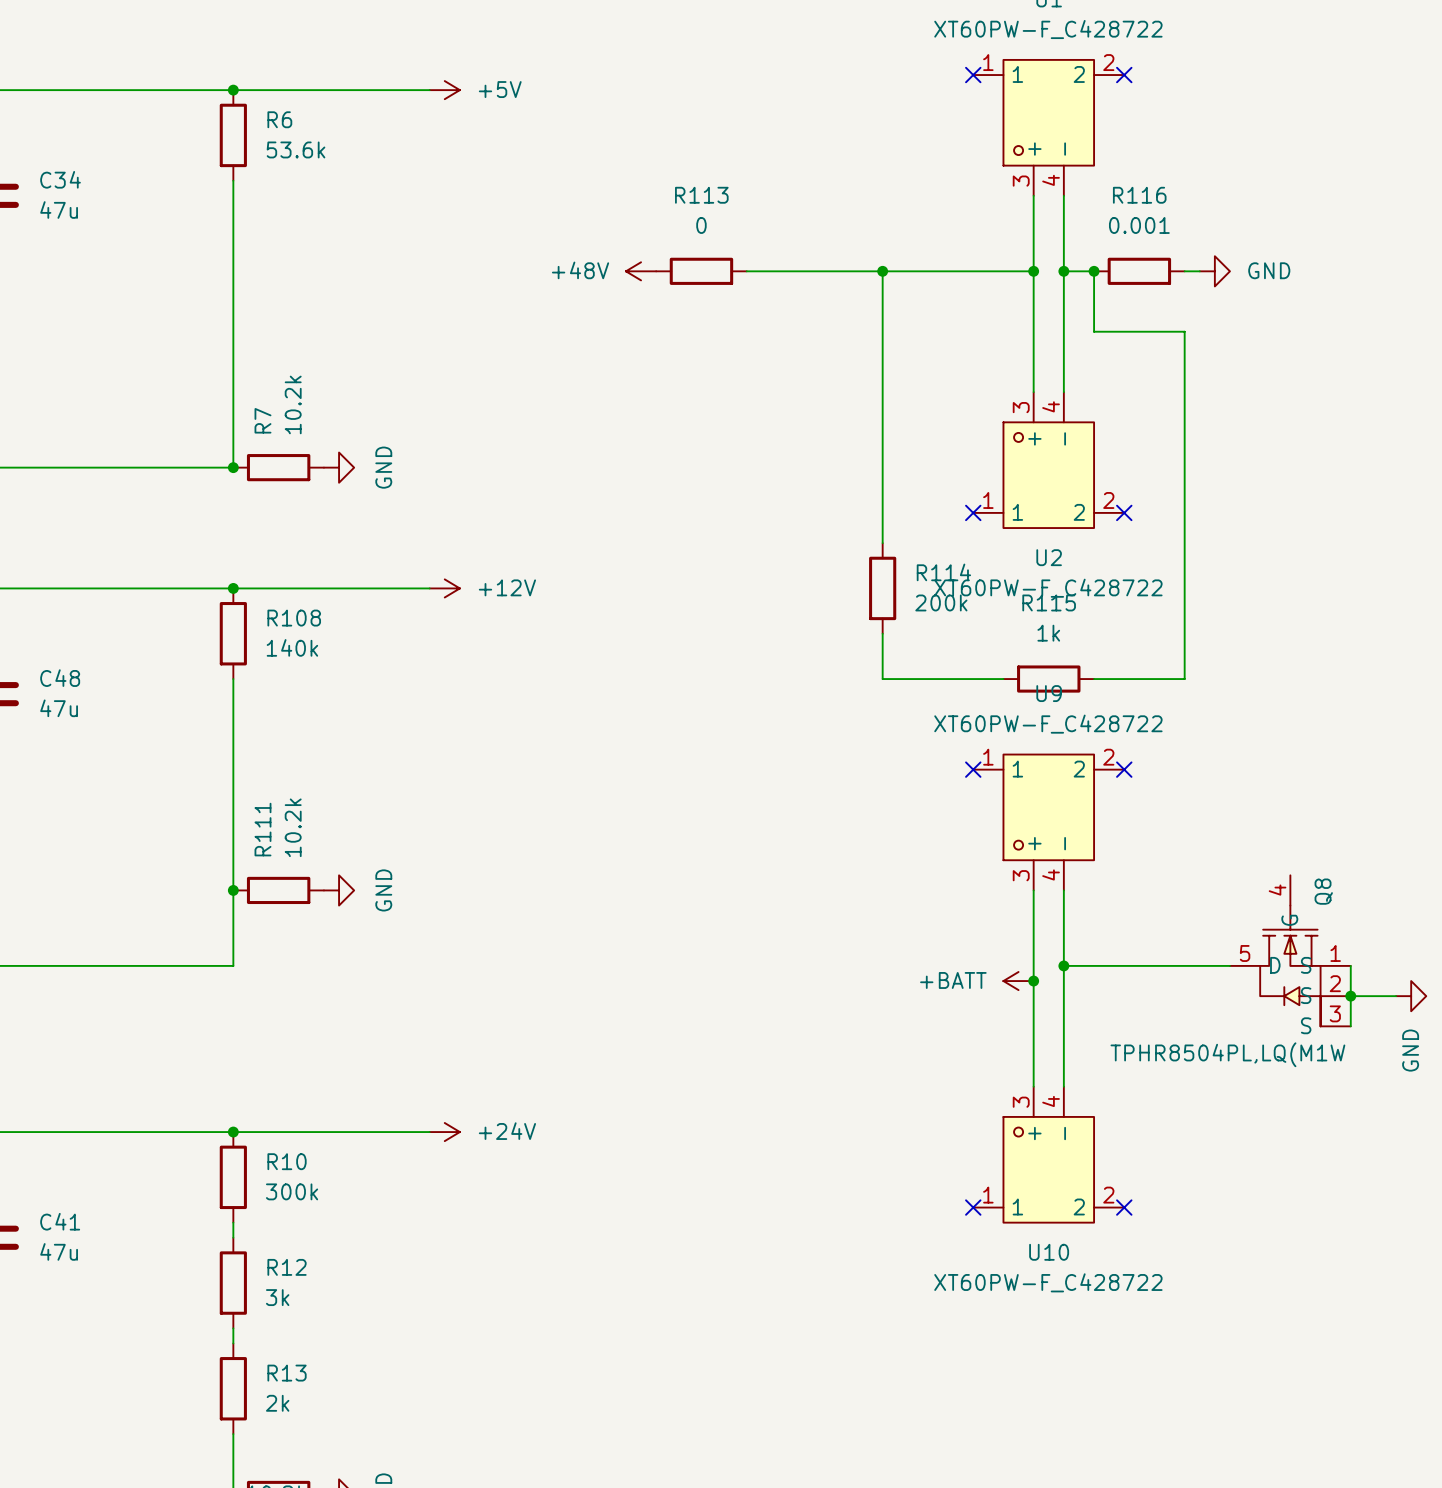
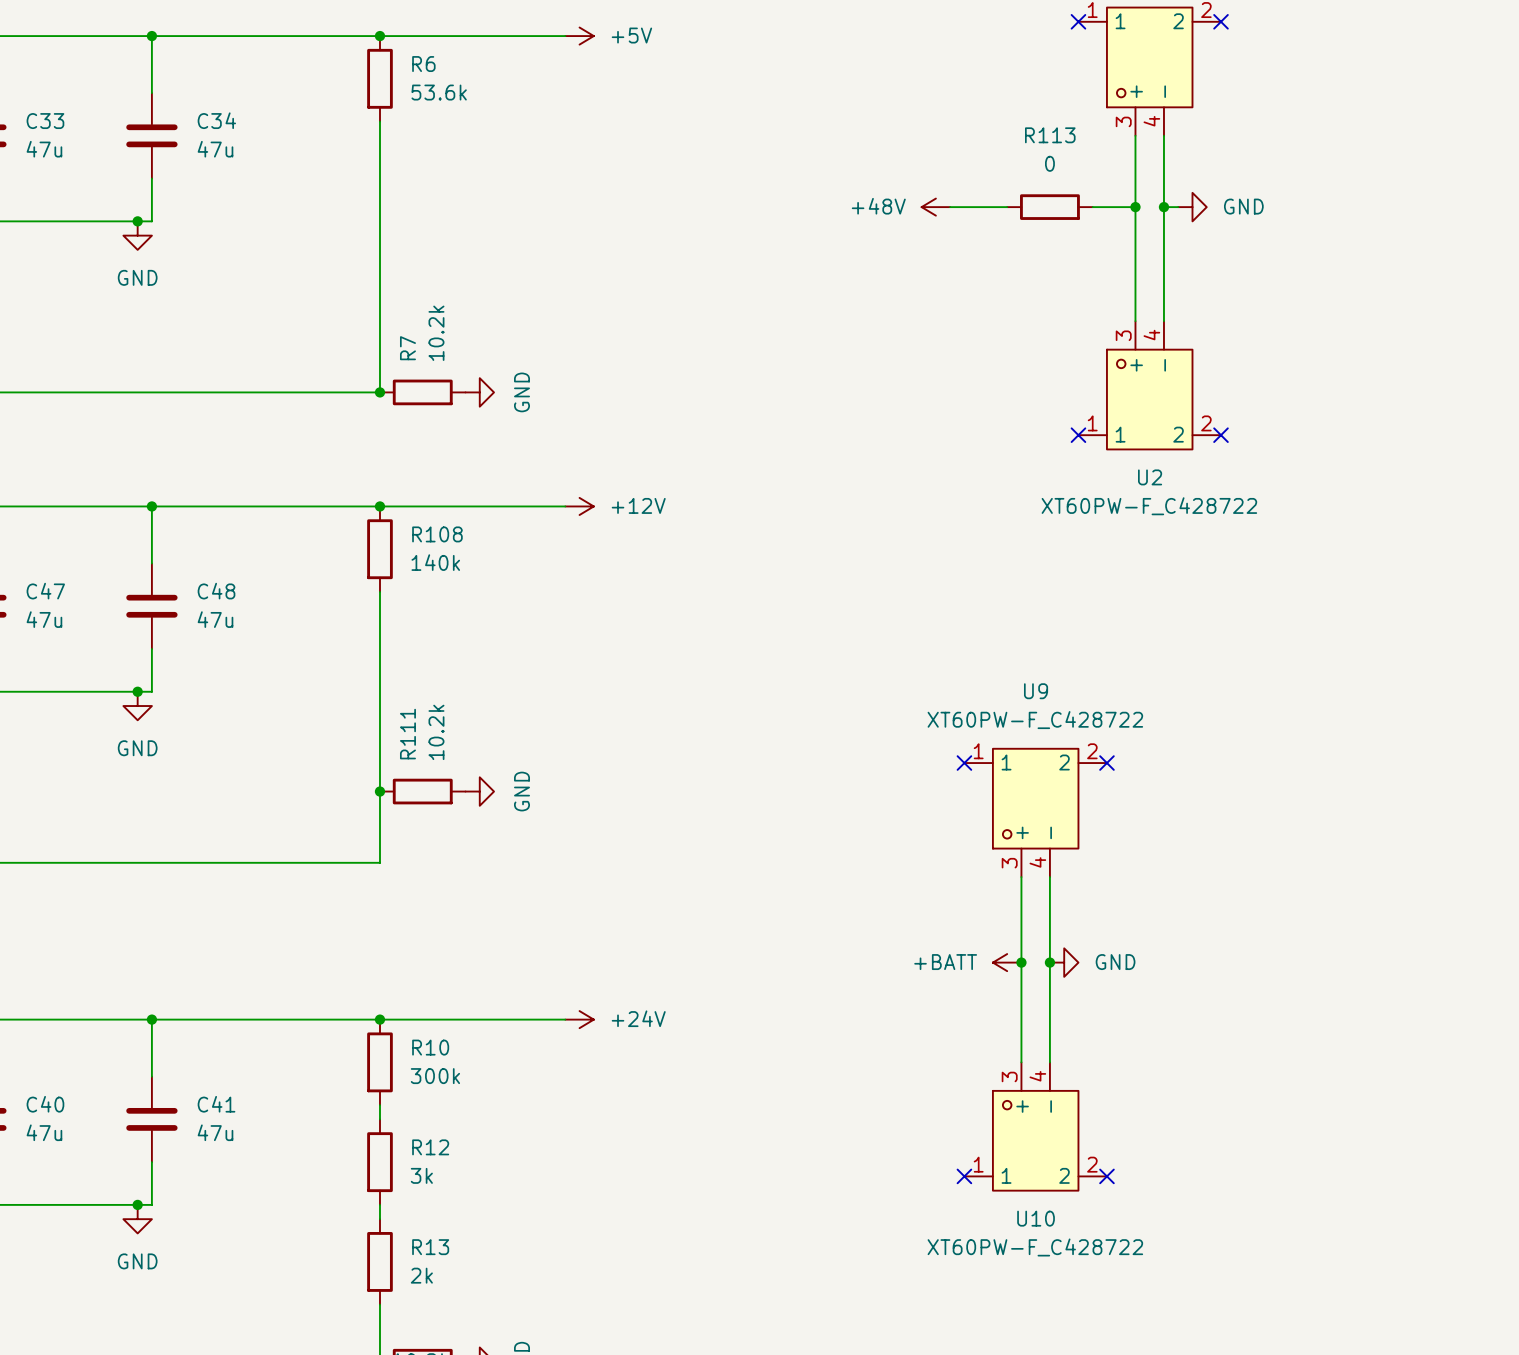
power symbol position: +48V (641, 271) -> +48V (935, 207)
R113 position: (701, 271) -> (1049, 207)
wire: (746, 271) (837, 271) -> none
wire: (882, 271) (882, 543) -> none
junction: (882, 271) -> none
wire: (897, 271) (988, 271) -> none
wire: (1078, 271) (1094, 271) (1094, 331) (1184, 331) (1184, 679) (1094, 679) -> none
junction: (1094, 271) -> none
R116: 0.001 (1139, 271) -> none
wire: (1184, 271) (1199, 271) -> none
power symbol position: GND (1214, 271) -> GND (1192, 207)
R114: 200k (882, 588) -> none
wire: (882, 633) (882, 679) (1003, 679) -> none
R115: 1k (1048, 679) -> none
no-connect mark: (973, 769) -> none
no-connect mark: (1124, 769) -> none
U9 position: (1048, 822) -> (1035, 812)
no-connect mark: none -> (964, 763)
no-connect mark: none -> (1106, 763)
wire: (1033, 890) (1033, 1086) -> (1021, 877) (1021, 1062)
wire: (1063, 890) (1063, 1086) -> (1049, 877) (1049, 1062)
Q8: TPHR8504PL,LQ(M1W (1290, 950) -> none
wire: (1063, 965) (1229, 965) -> none
junction: (1063, 965) -> none
wire: (1350, 965) (1350, 1026) -> none
power symbol position: +BATT (1018, 981) -> +BATT (1007, 962)
junction: (1033, 981) -> none
wire: (1350, 996) (1396, 996) -> none
junction: (1350, 996) -> none
power symbol: GND (1411, 996) -> none
junction: none -> (1021, 962)
junction: none -> (1049, 962)
power symbol: none -> GND (1064, 962)
U10 position: (1048, 1154) -> (1035, 1126)
no-connect mark: (973, 1207) -> none
no-connect mark: (1124, 1207) -> none
no-connect mark: none -> (964, 1176)
no-connect mark: none -> (1106, 1176)

